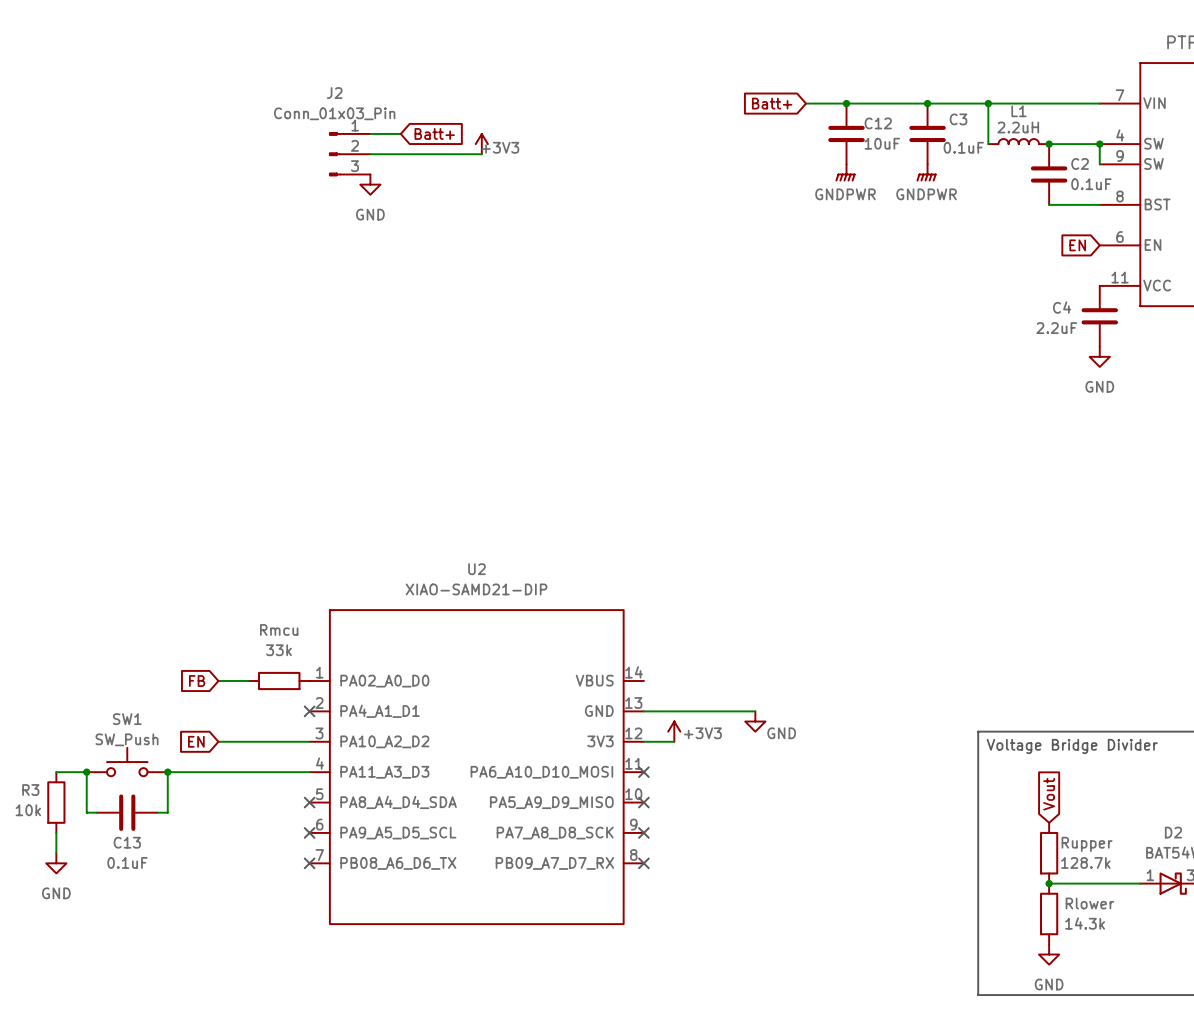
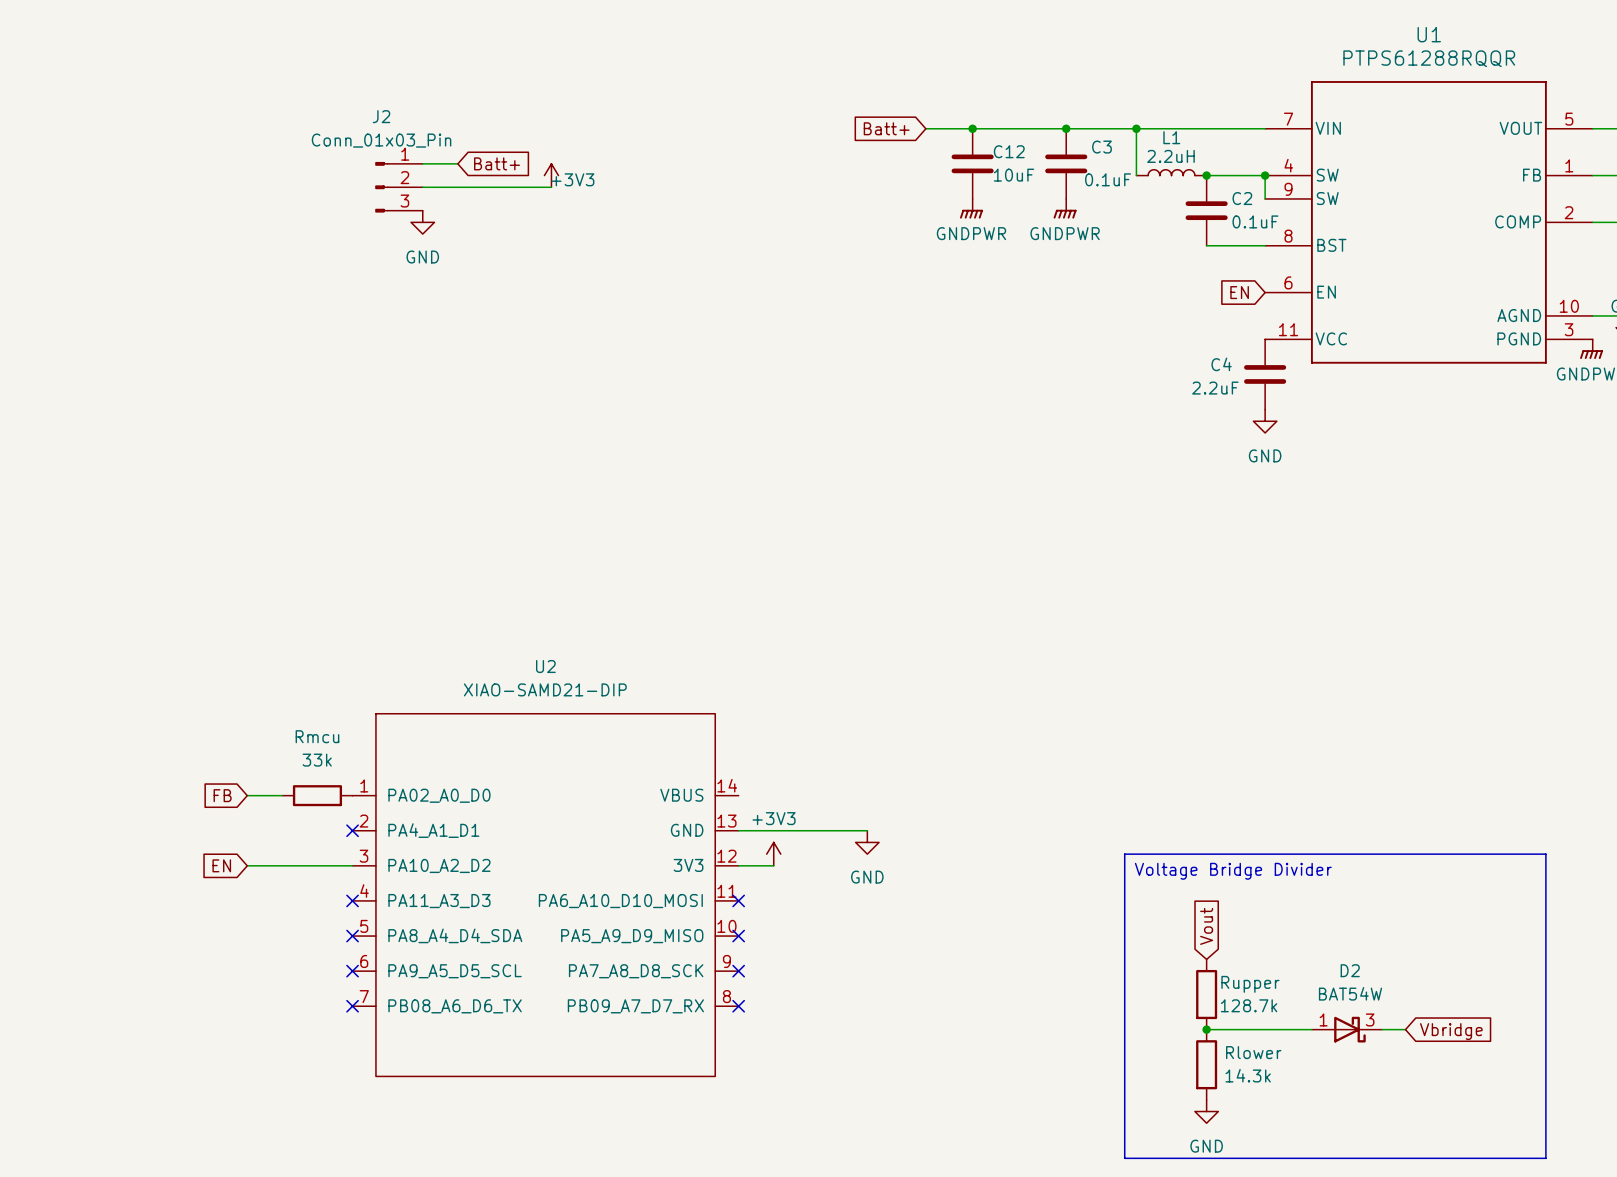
power symbol text position: +3V3 (702, 733) -> +3V3 (774, 818)
power symbol text position: GND (781, 733) -> GND (867, 877)
SW1: SW_Push (127, 762) -> none
wire: (56, 772) (86, 772) (86, 812) (96, 812) -> none
junction: (86, 772) -> none
junction: (167, 772) -> none
wire: (309, 772) (167, 772) (167, 812) (157, 812) -> none
no-connect mark: none -> (352, 900)
R3: 10k (56, 802) -> none
C13: 0.1uF (127, 812) -> none
wire: (56, 832) (56, 853) -> none
power symbol: GND (56, 863) -> none

